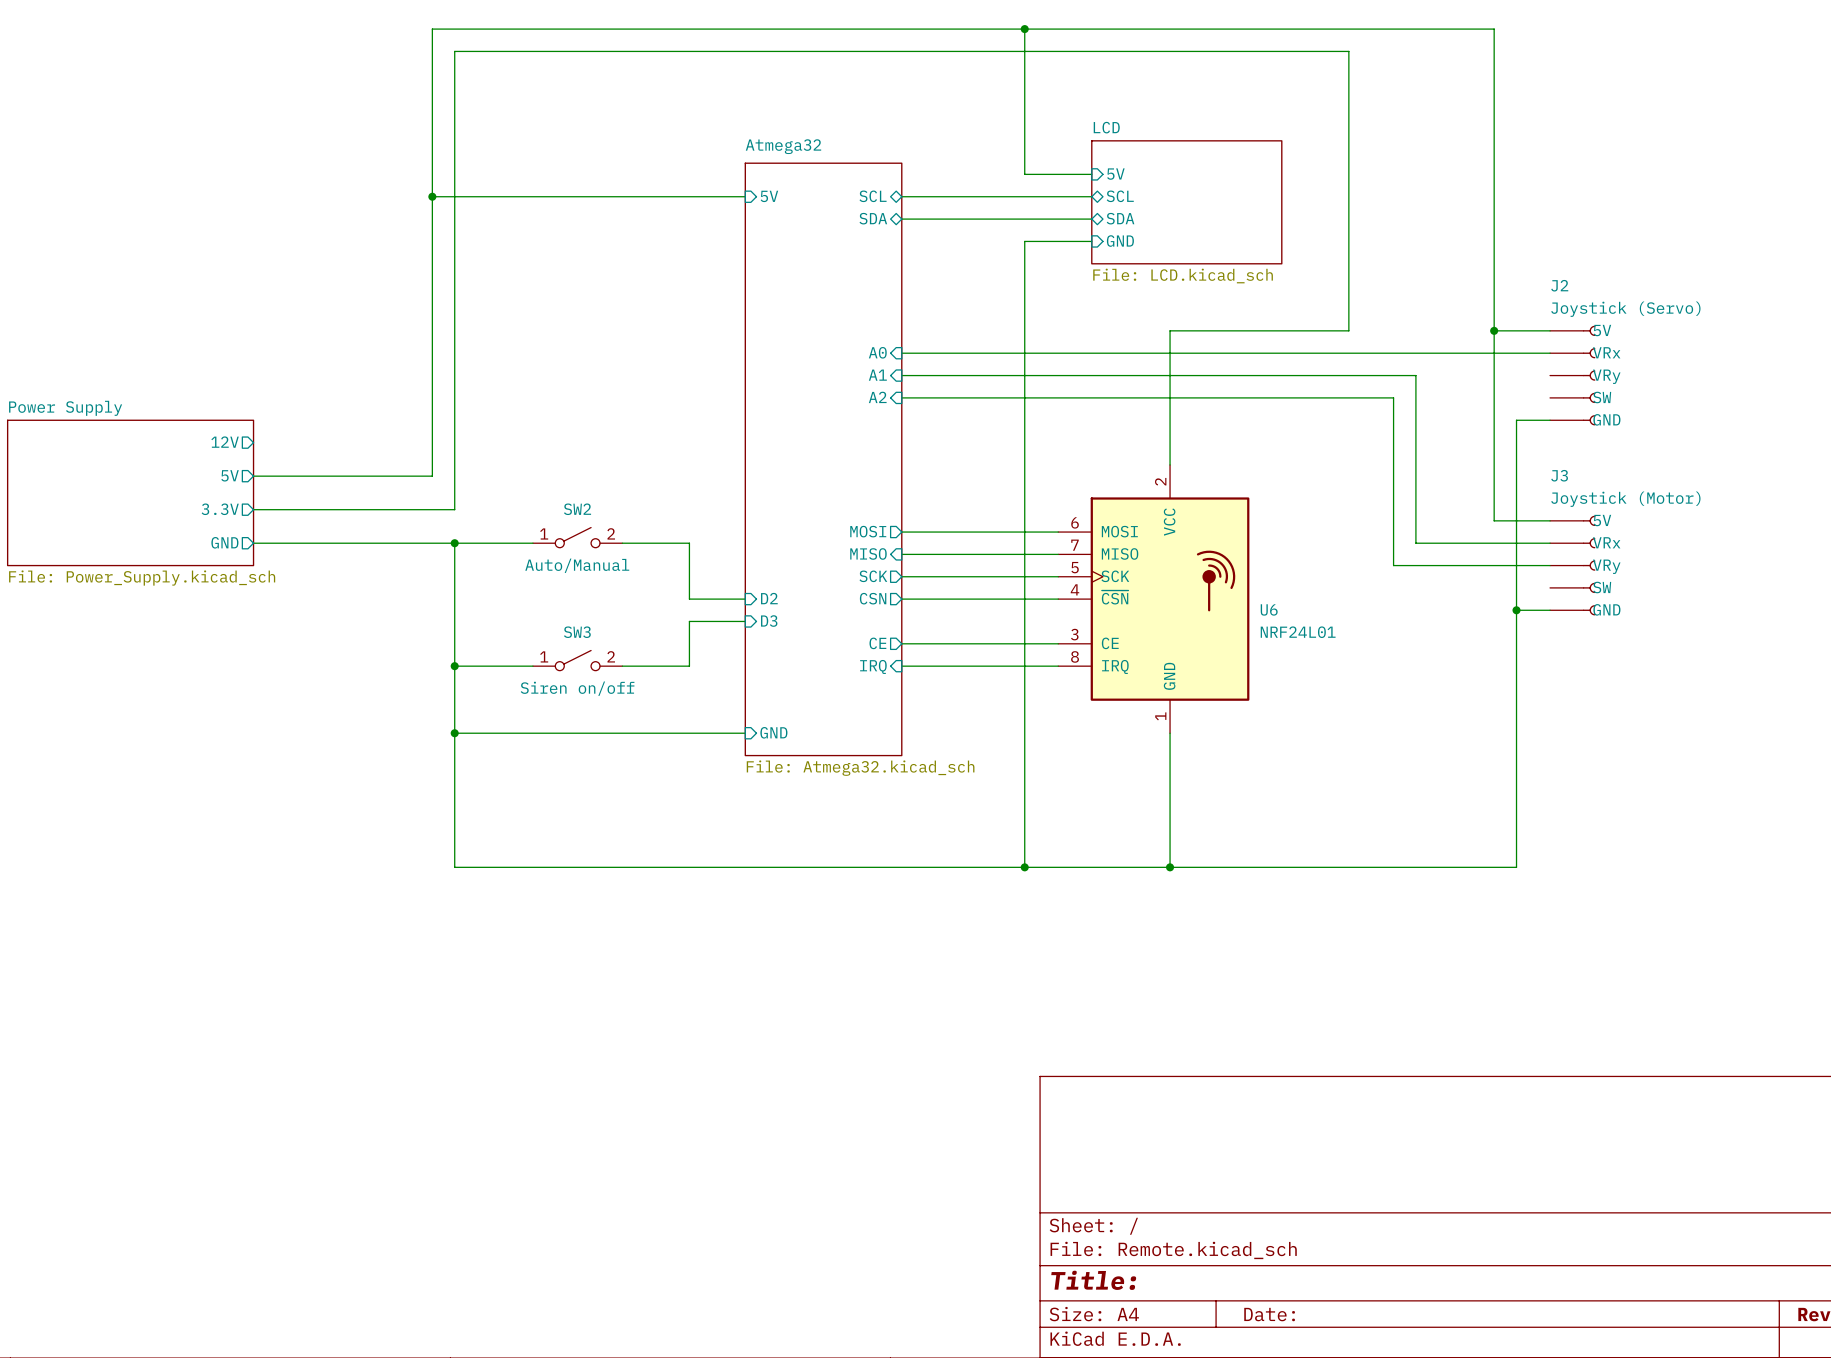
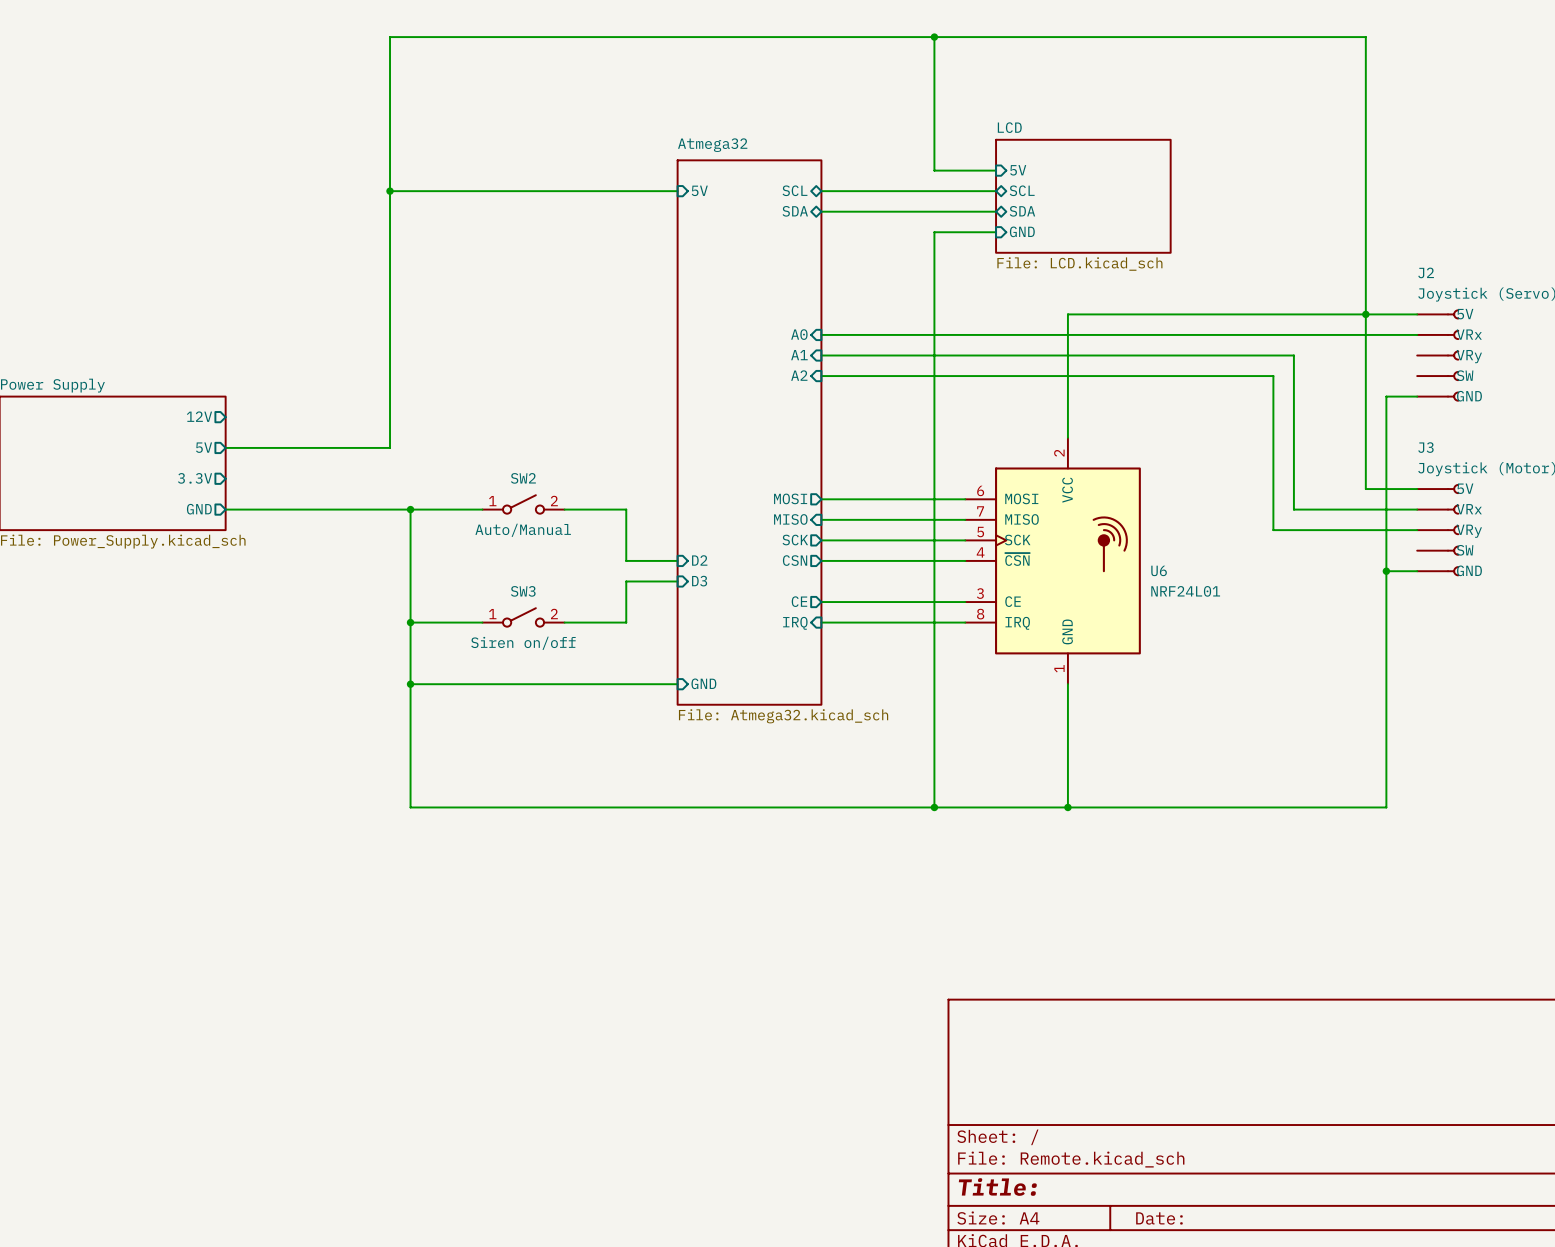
wire: (1348, 330) (1348, 51) (454, 51) (454, 509) (253, 509) -> (1232, 314) (1365, 314)

